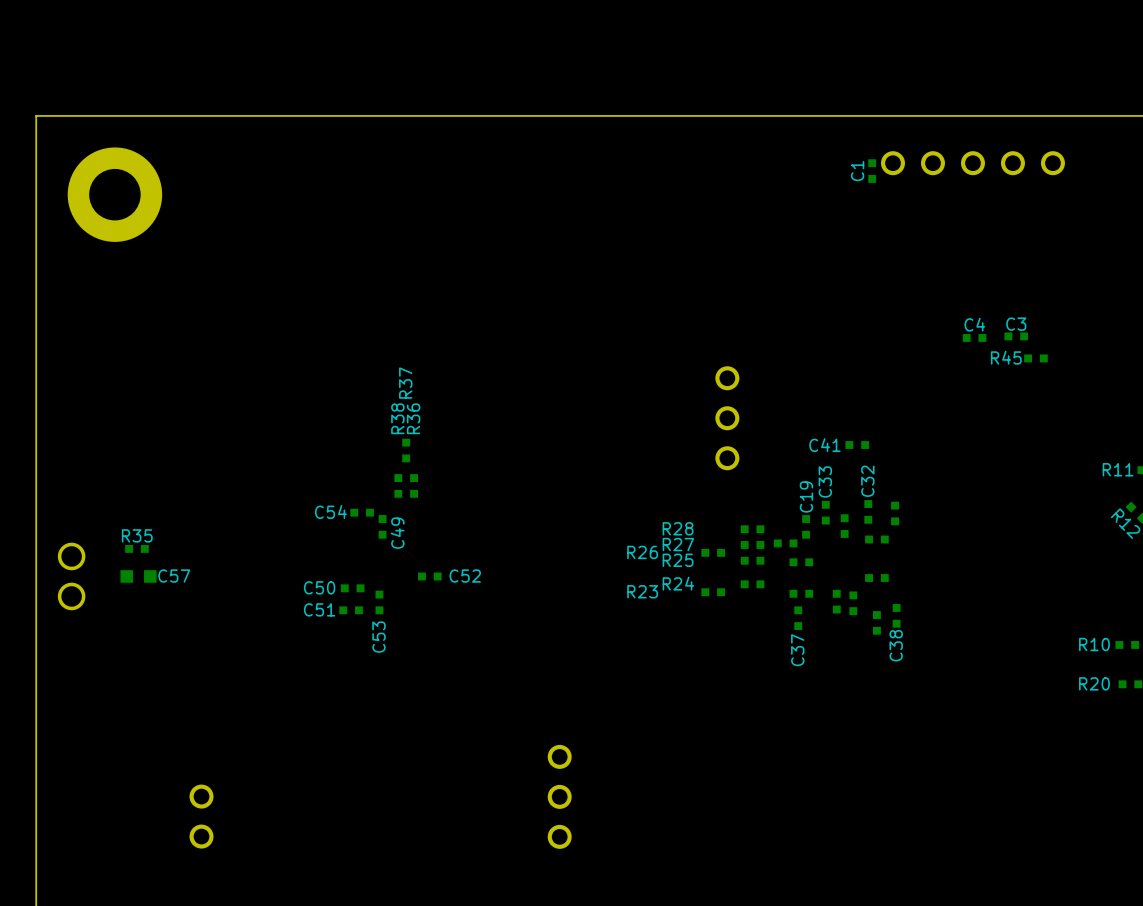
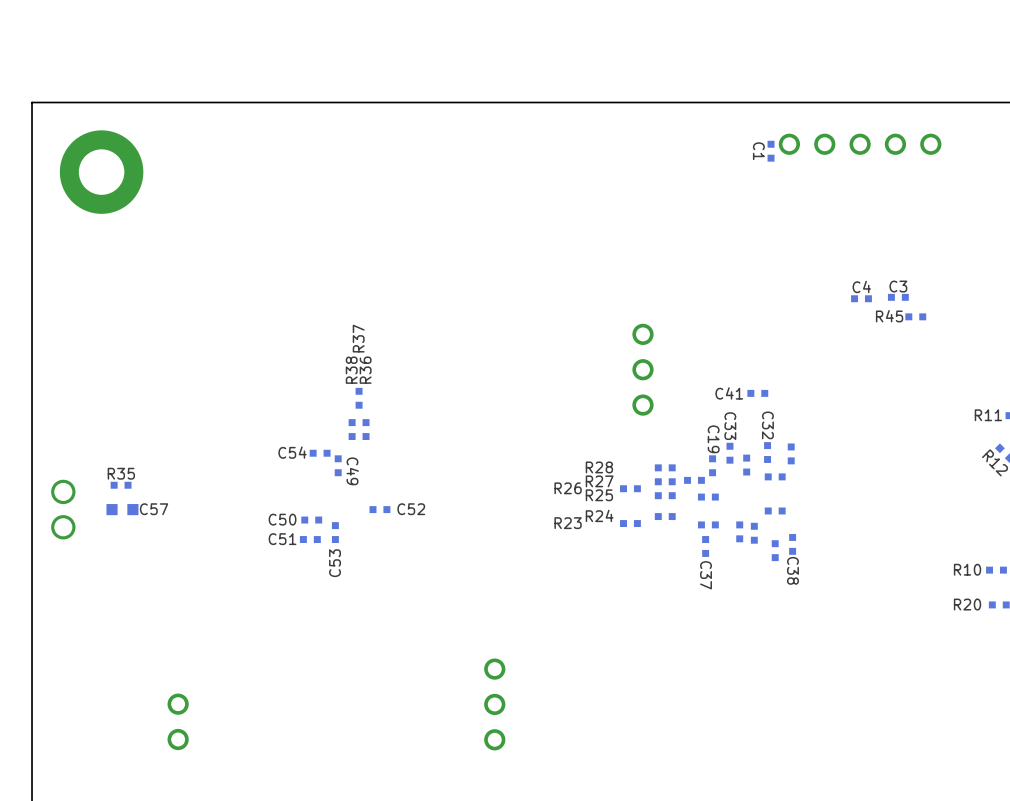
C1 name rotation: 0° (857, 171) -> 180° (758, 151)
C32 name rotation: 0° (867, 481) -> 180° (767, 425)
C33 name rotation: 0° (825, 482) -> 180° (730, 426)
C19 name rotation: 0° (806, 496) -> 180° (713, 439)
C49 name rotation: 0° (397, 533) -> 180° (352, 471)
C38 name rotation: 0° (896, 645) -> 180° (792, 570)
C37 name rotation: 0° (797, 650) -> 180° (706, 575)

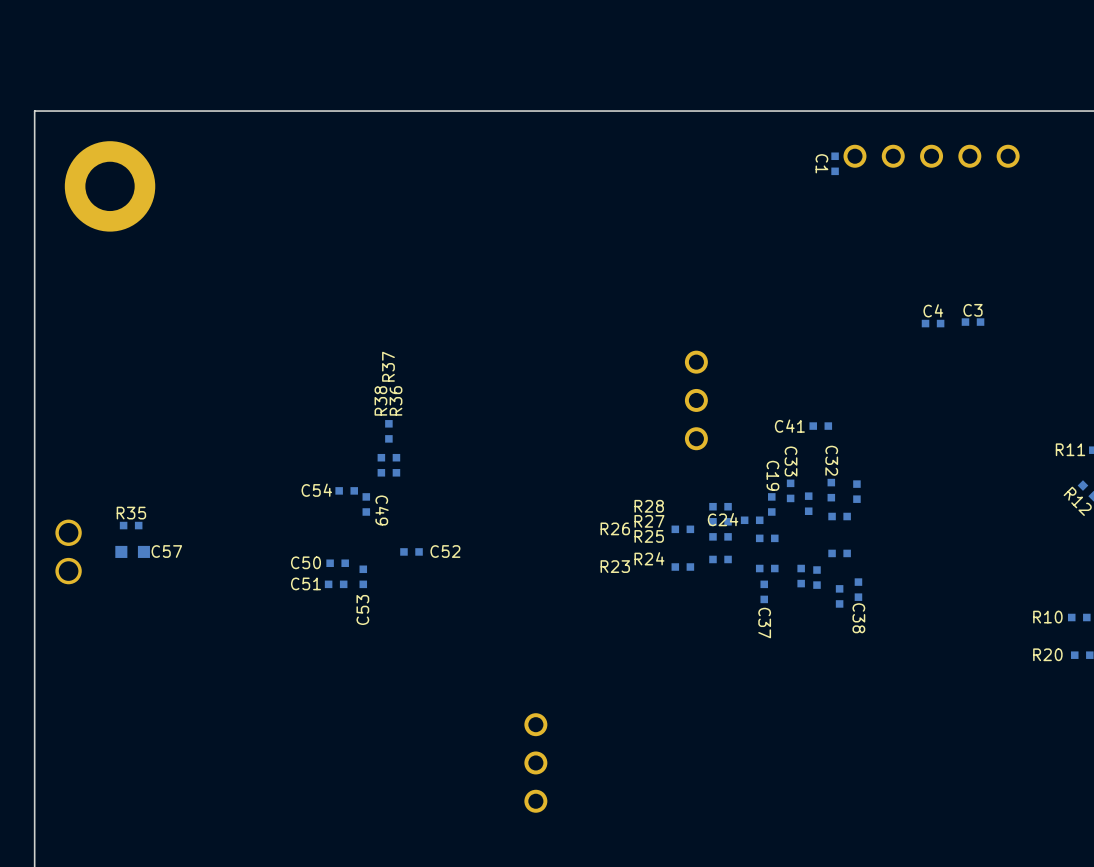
R45: (915, 316) -> none
C24 name: none -> C24 (723, 519)
part: (178, 721) -> none

